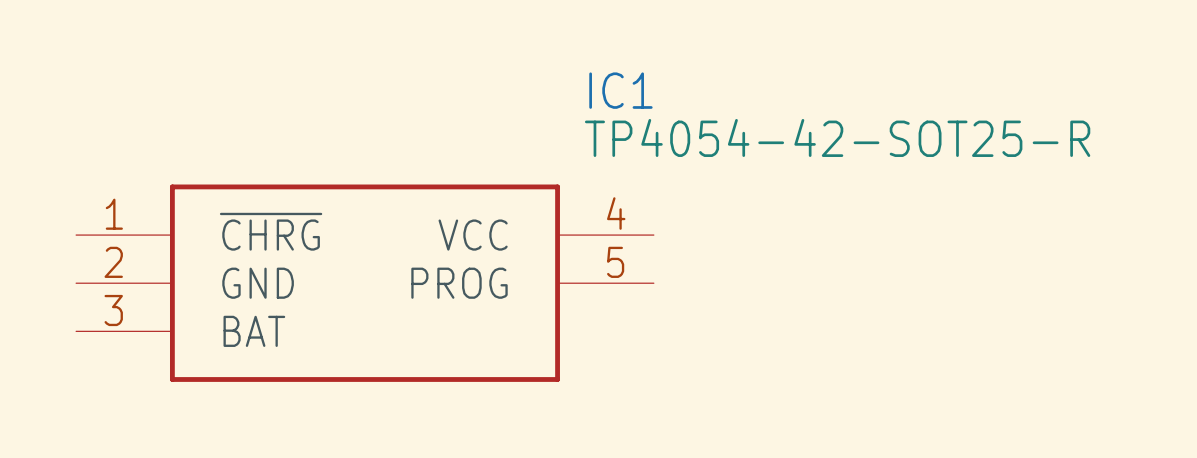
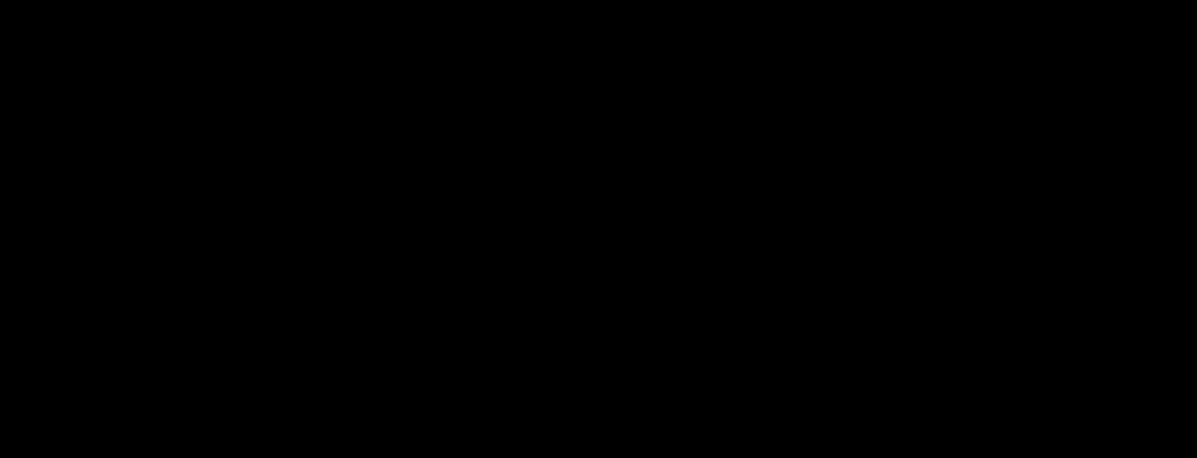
IC1: TP4054-42-SOT25-R (364, 283) -> none

